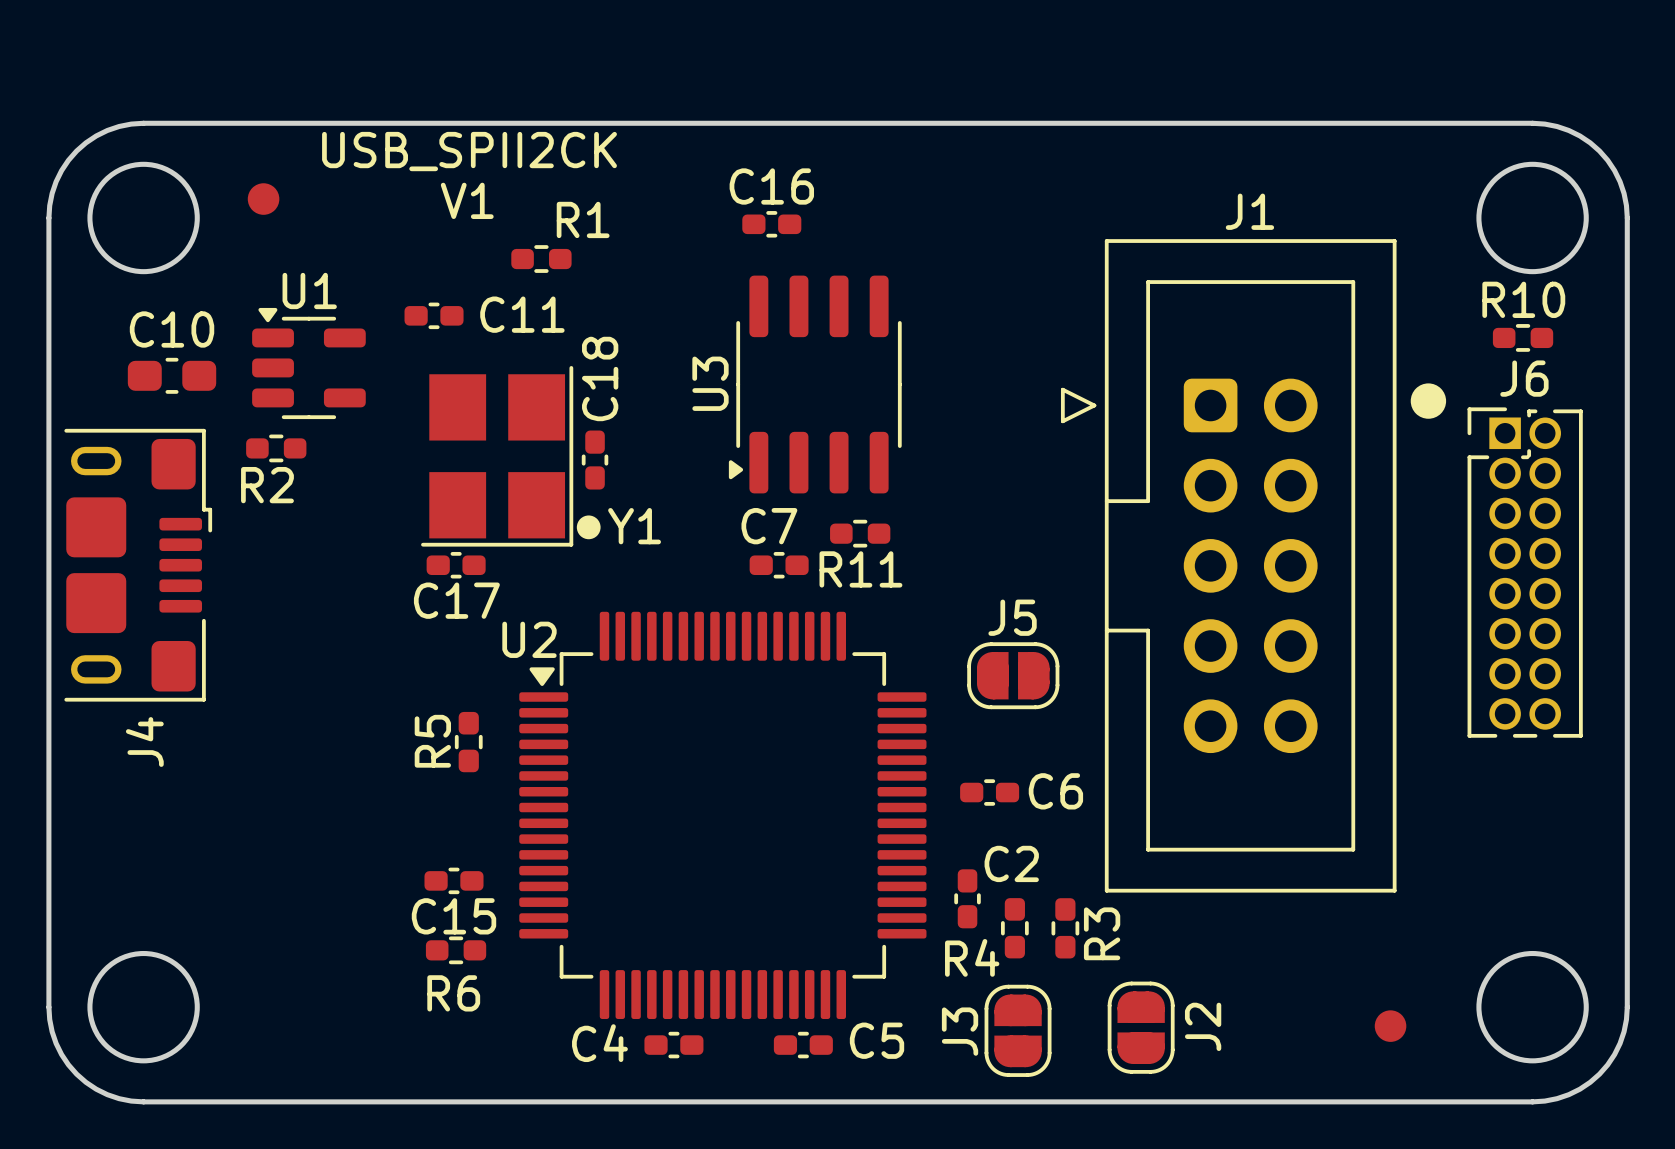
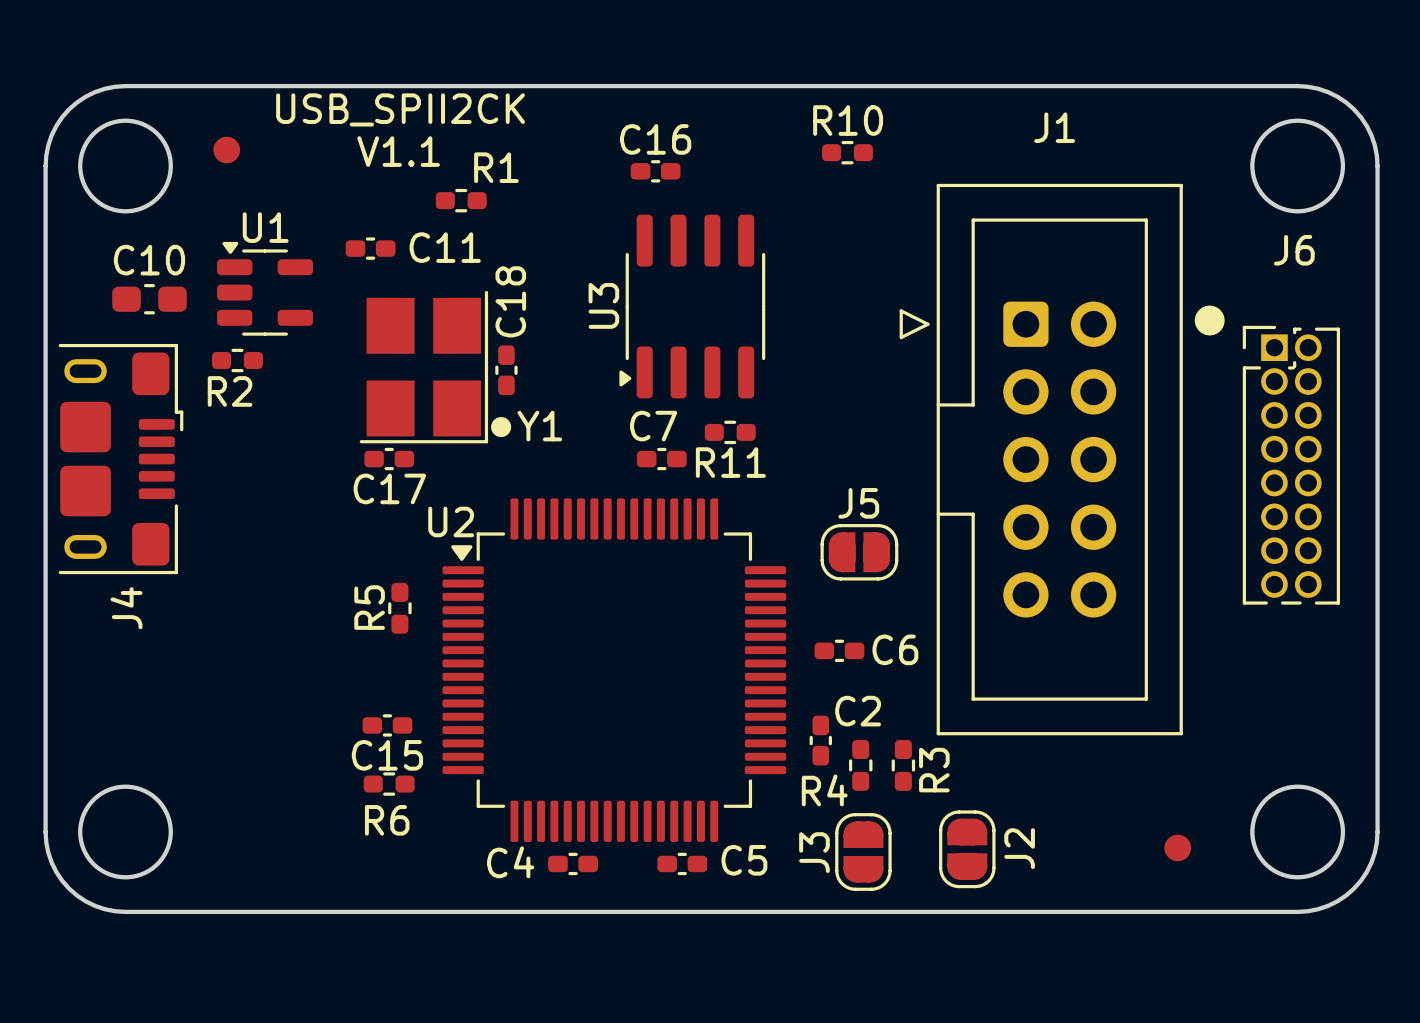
text: V1 (467, 200) -> V1.1 (398, 151)
J1 name position: J1 (1249, 211) -> J1 (1054, 127)
R10 position: (1523, 337) -> (847, 152)
J6 name position: J6 (1524, 378) -> J6 (1294, 250)

